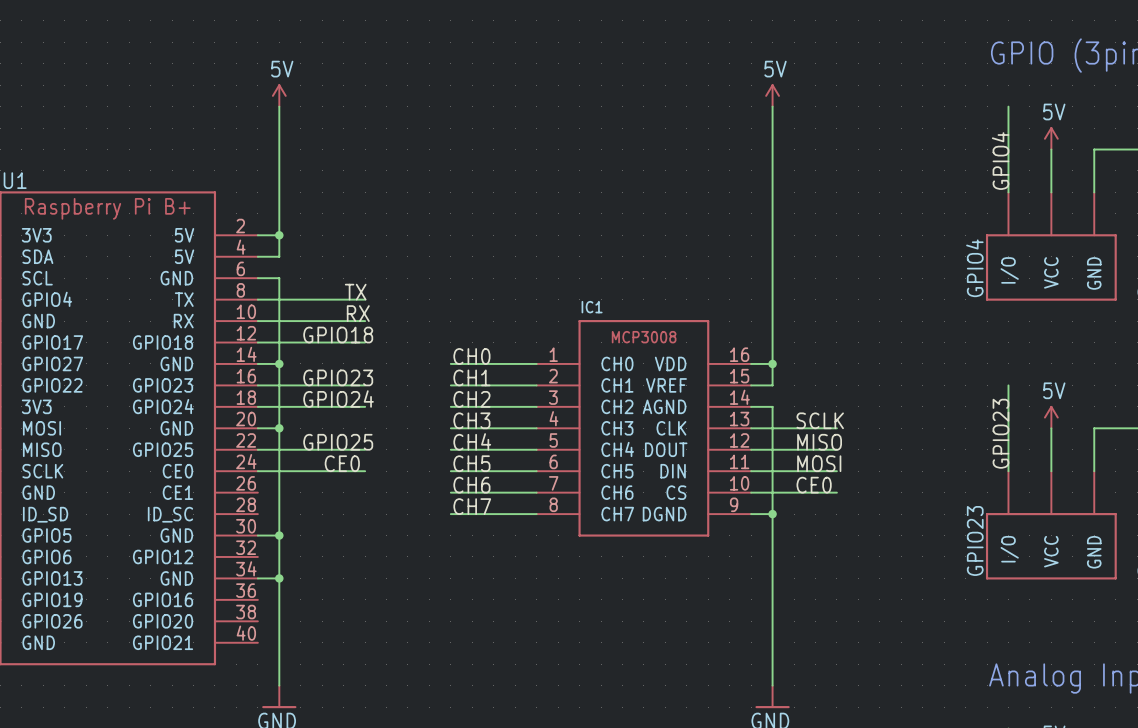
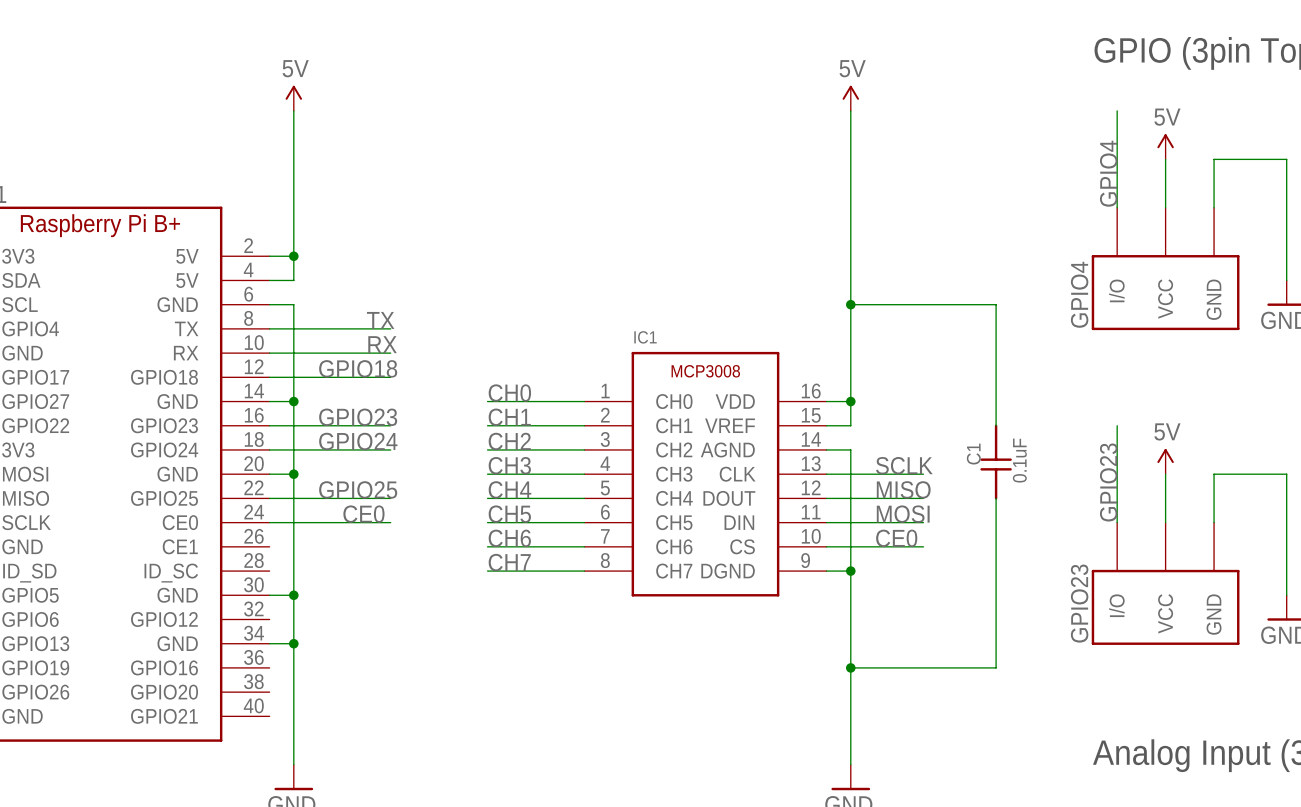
wire: none -> (850, 304) (996, 304) (996, 425)
junction: none -> (850, 304)
C1: none -> 0.1uF (996, 462)
wire: none -> (996, 498) (996, 667) (850, 667)
junction: none -> (850, 667)

